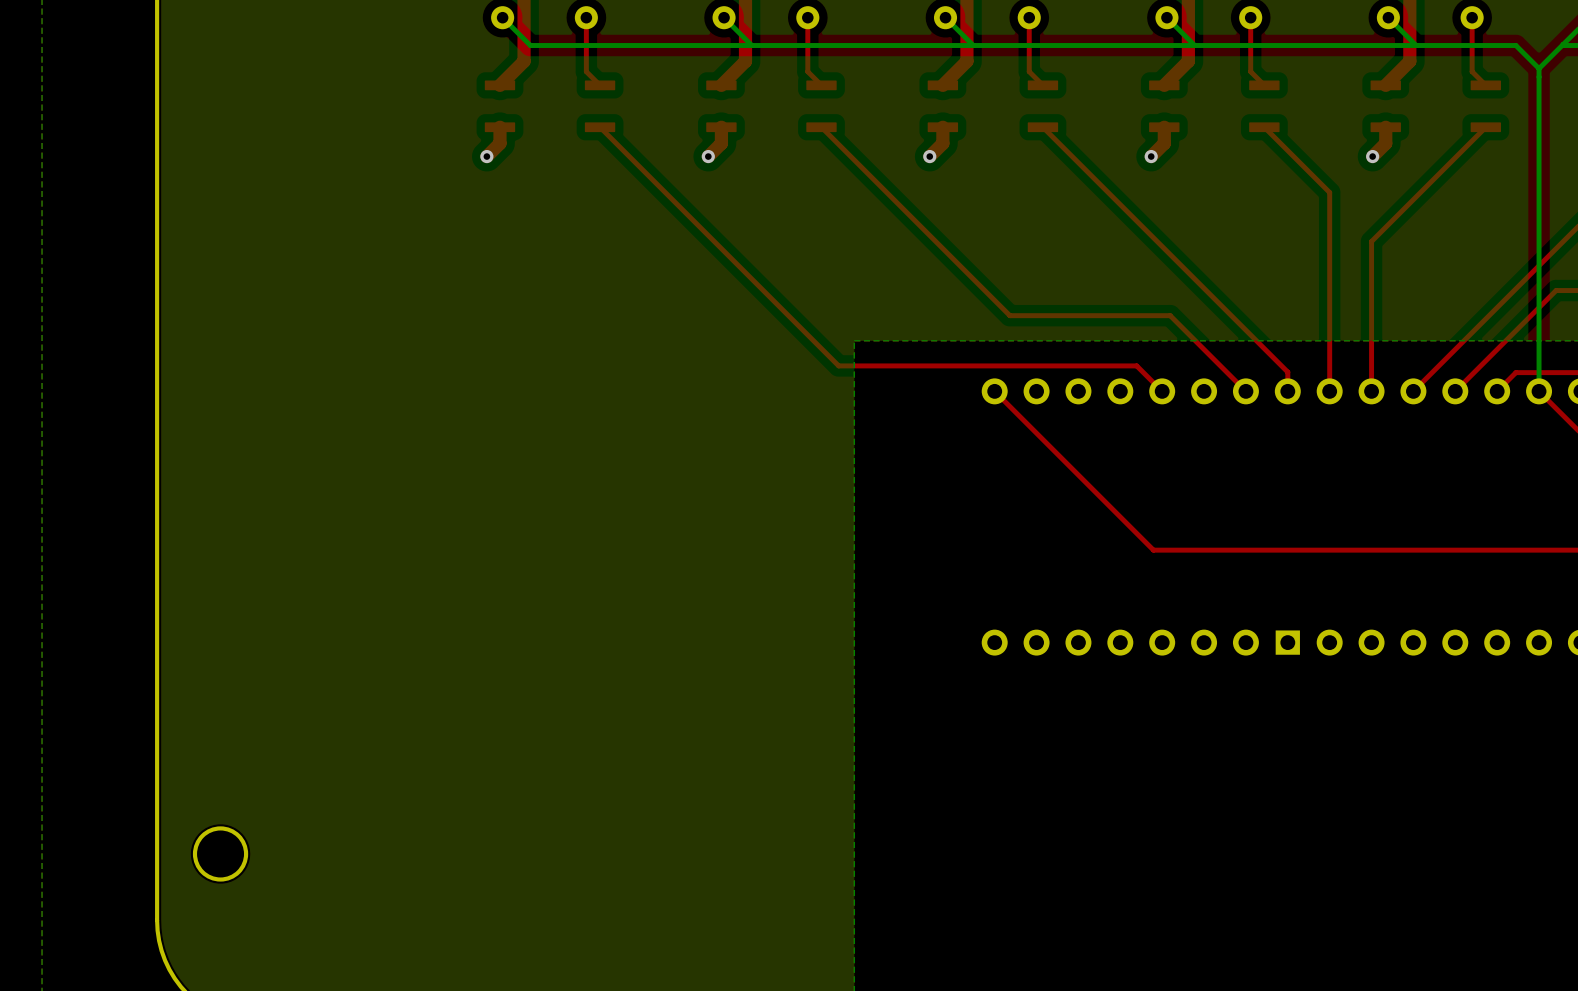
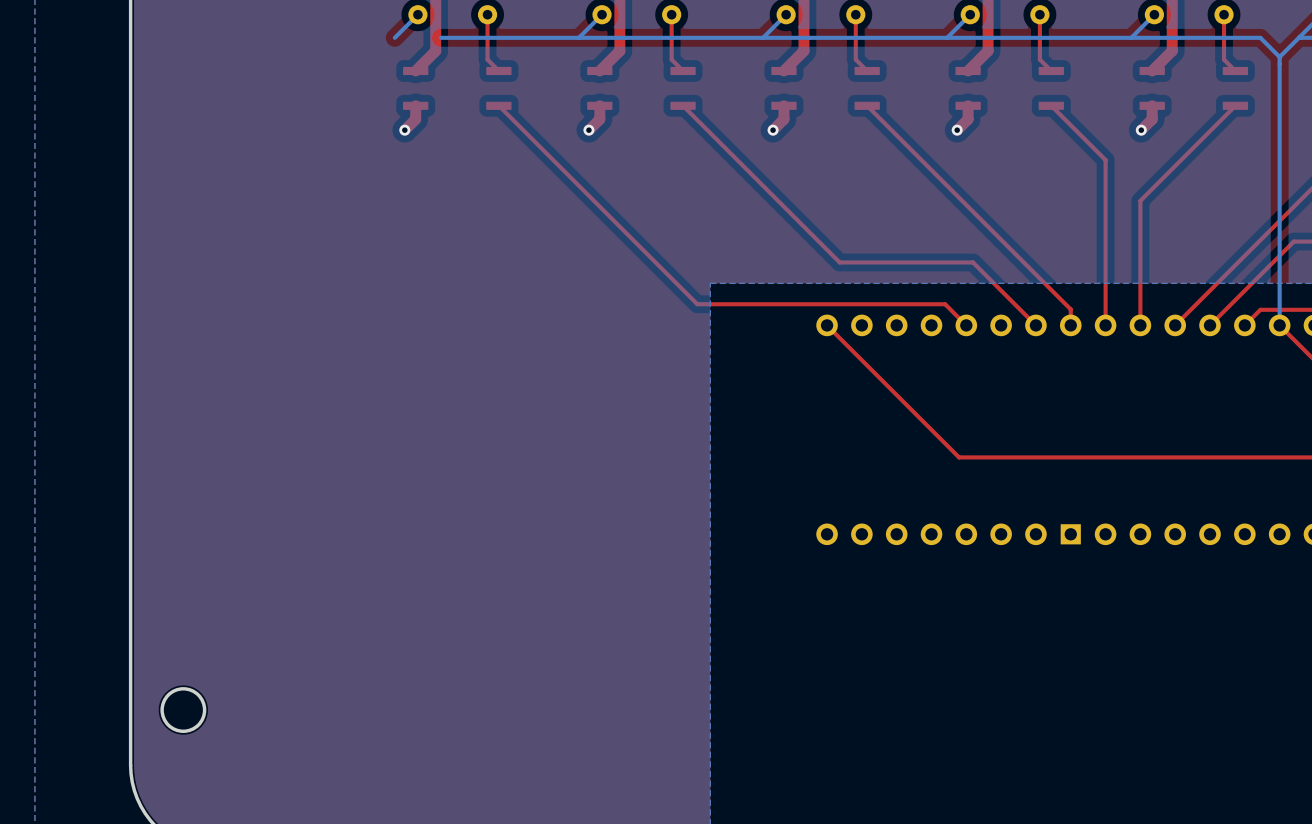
bottom track: (502, 17) (530, 45) -> (417, 14) (394, 37)
bottom track: (724, 17) (751, 45) -> (602, 14) (578, 37)
bottom track: (945, 17) (973, 45) -> (786, 14) (763, 37)
bottom track: (1166, 17) (1194, 45) -> (970, 14) (947, 37)
bottom track: (1388, 17) (1416, 45) -> (1154, 14) (1131, 37)

